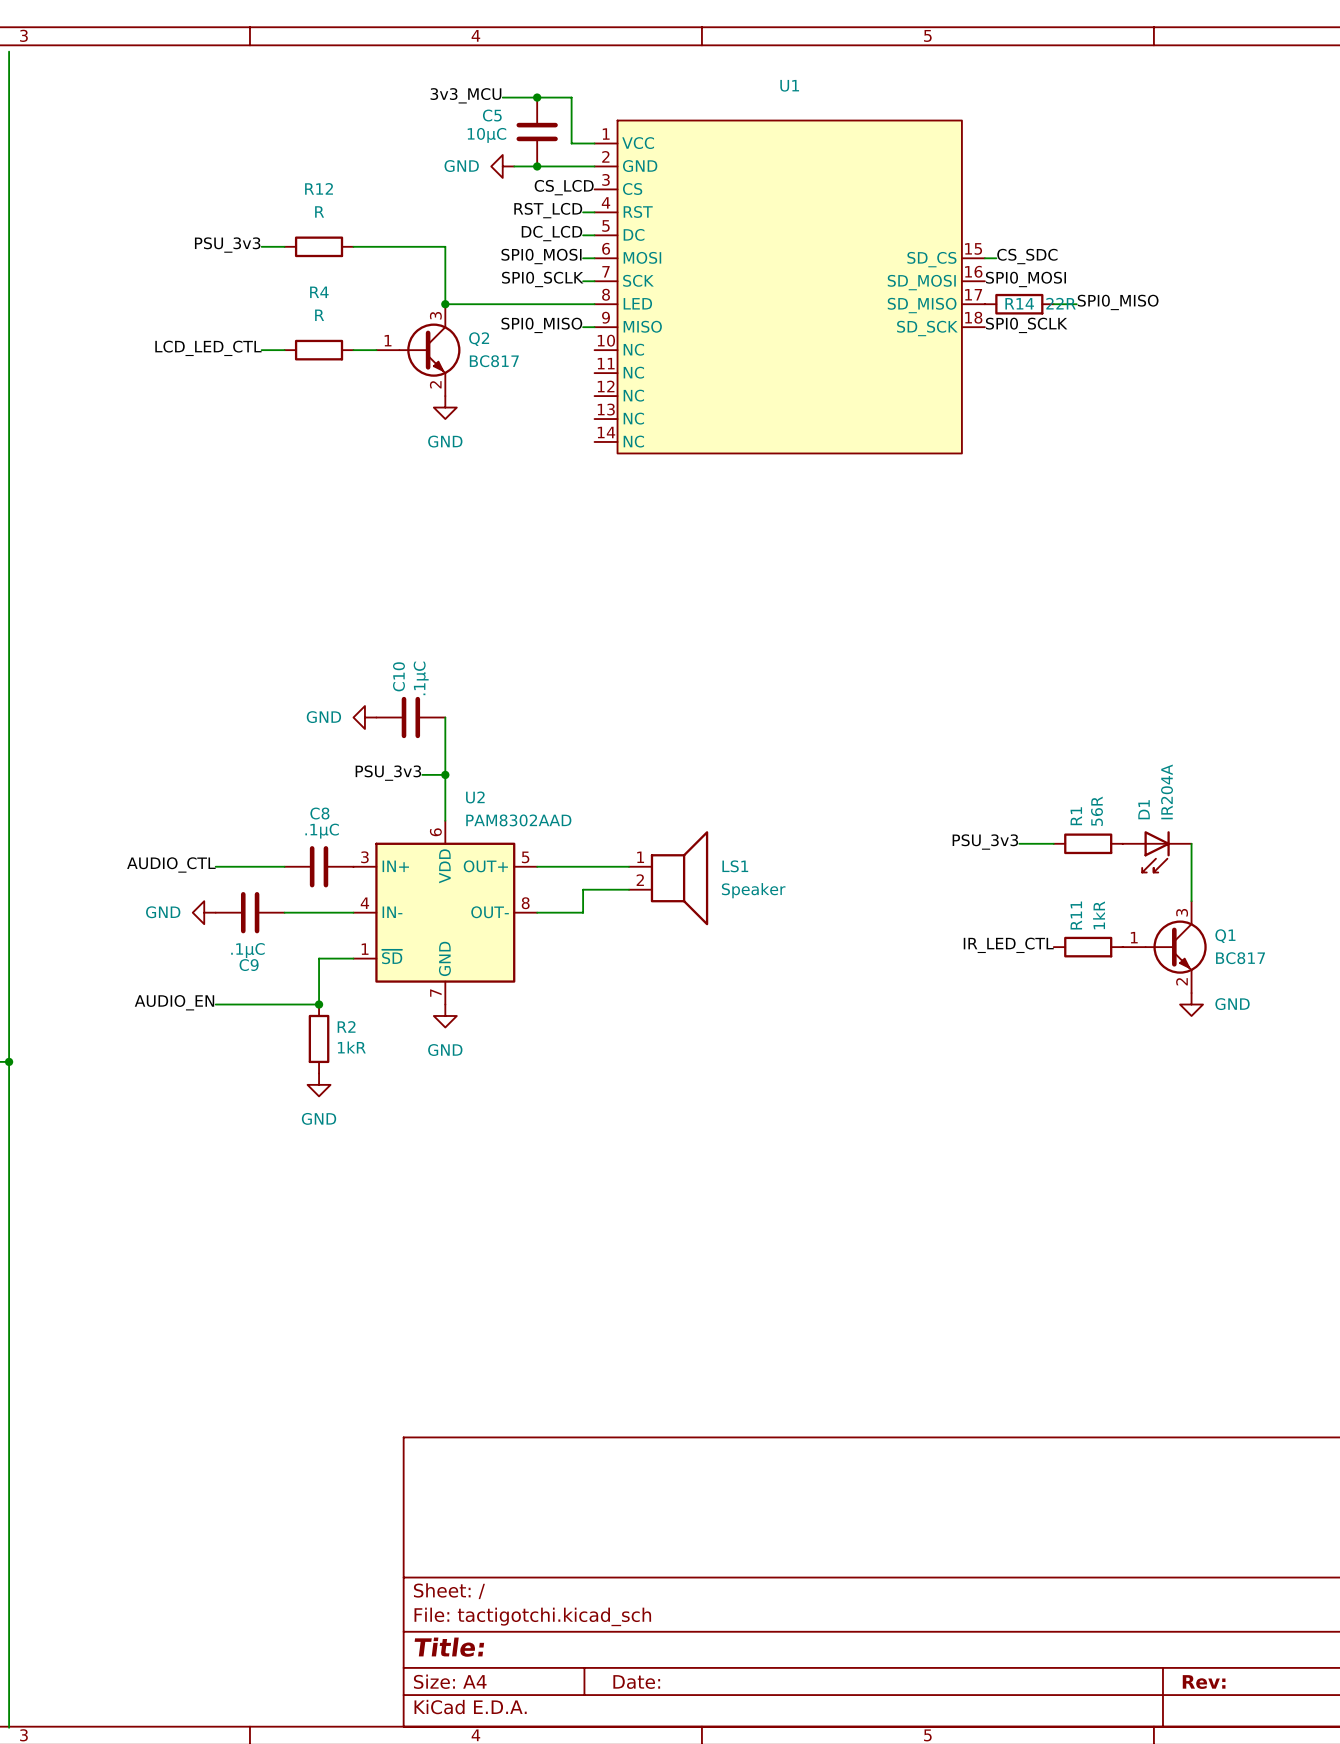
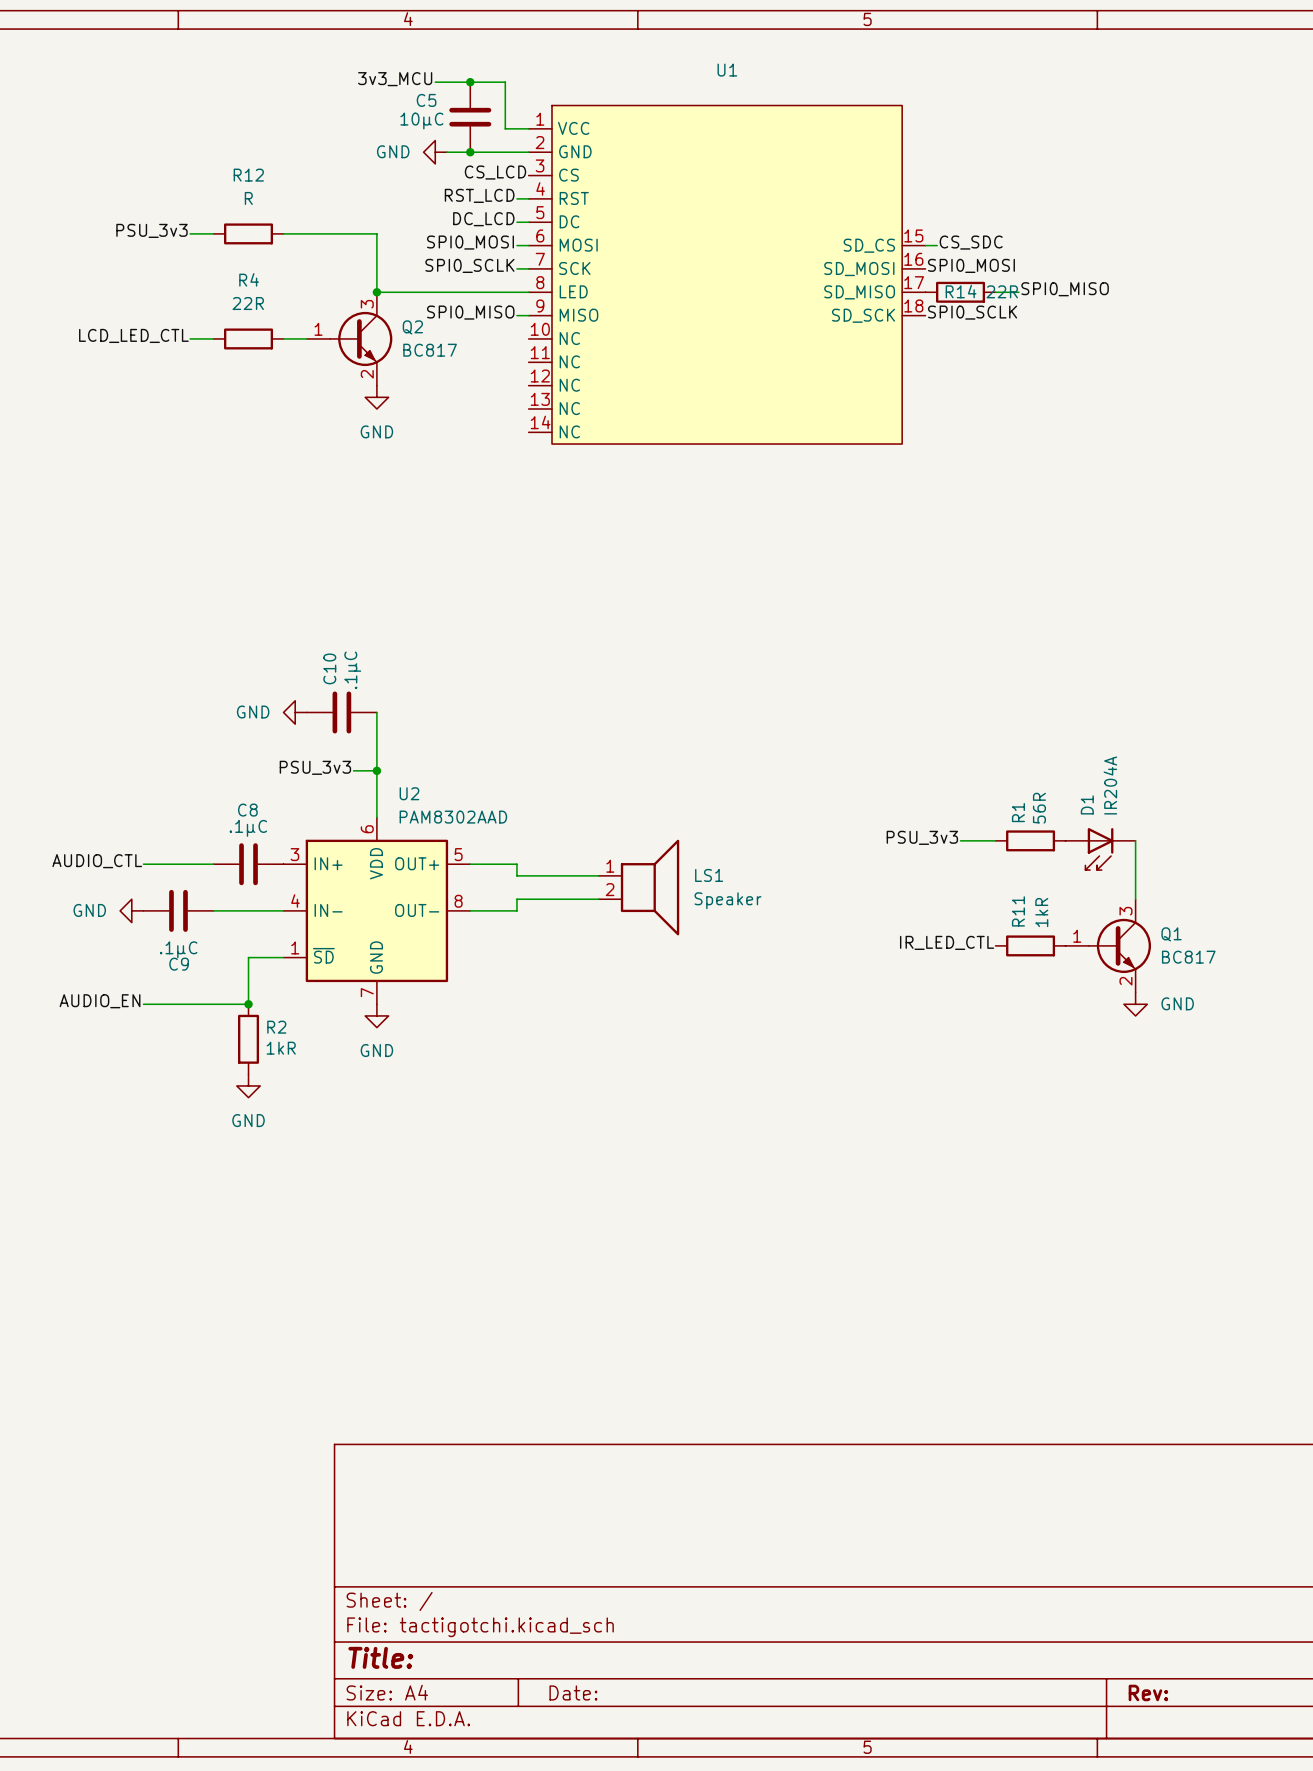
R4 value: R (319, 315) -> 22R (248, 303)
wire: (583, 866) (629, 866) -> (516, 864) (516, 875) (598, 875)
LS1 position: (668, 878) -> (638, 887)
wire: (629, 889) (583, 889) (583, 901) -> (598, 899) (516, 899)

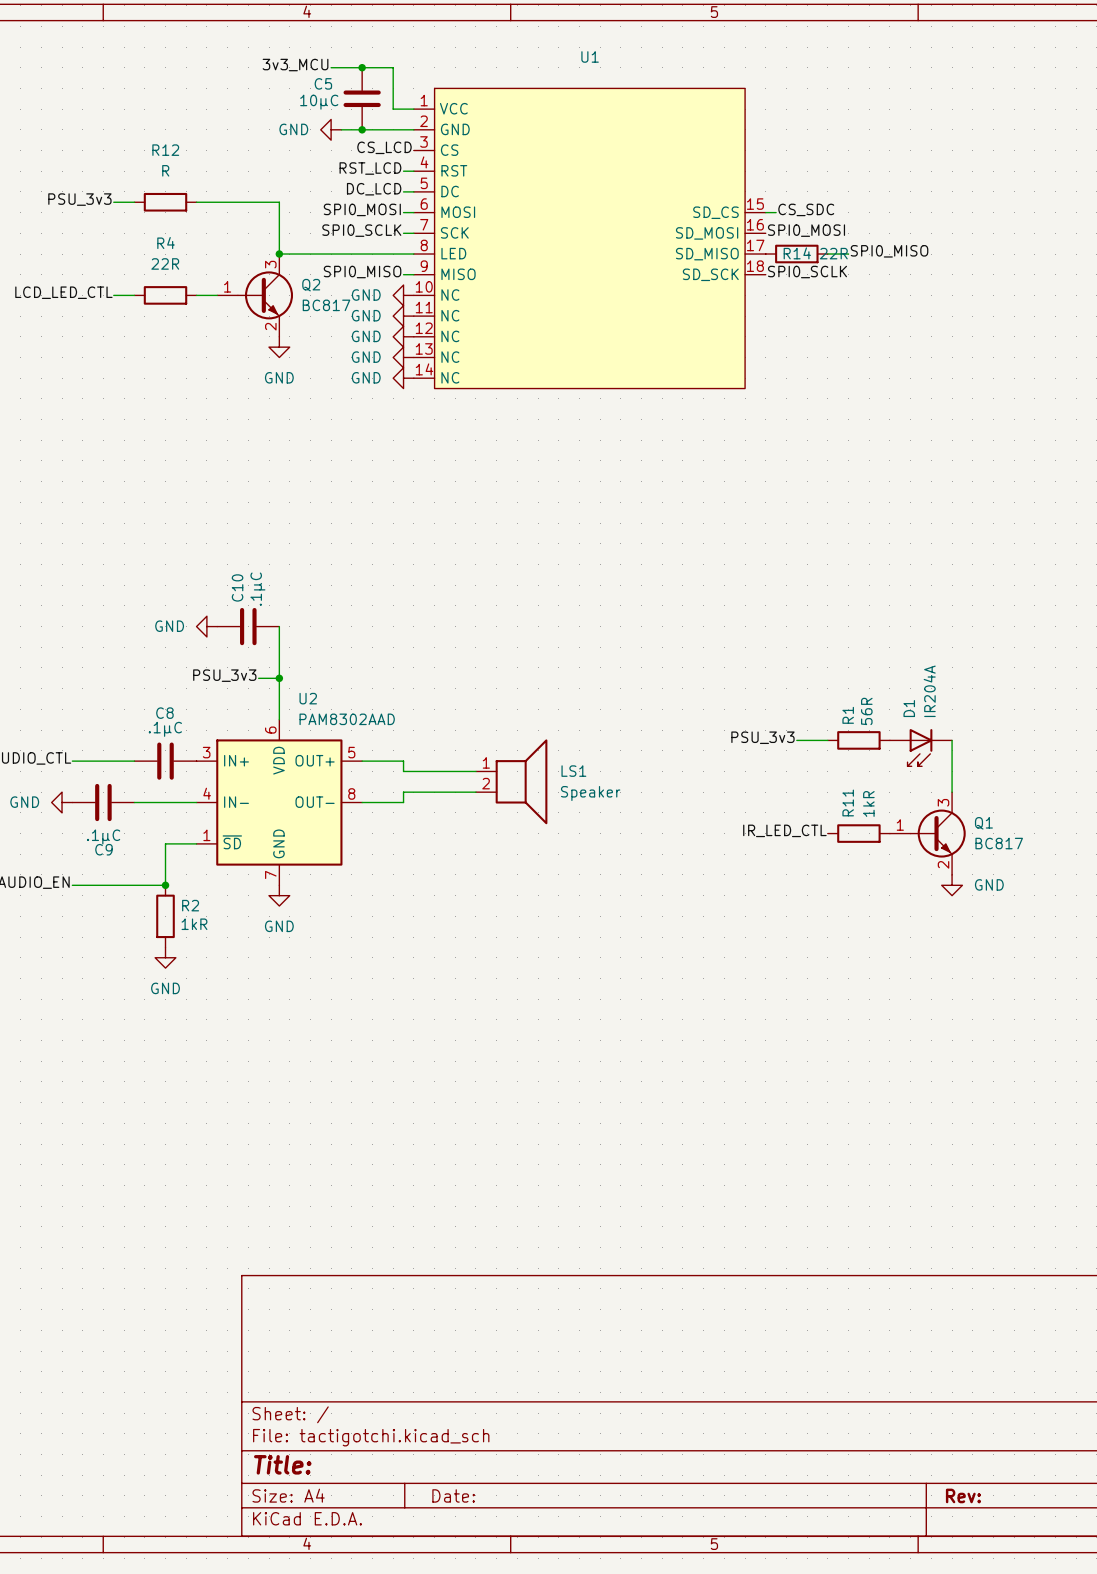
power symbol: none -> GND (403, 295)
power symbol: none -> GND (403, 316)
power symbol: none -> GND (403, 336)
power symbol: none -> GND (403, 357)
power symbol: none -> GND (403, 378)

